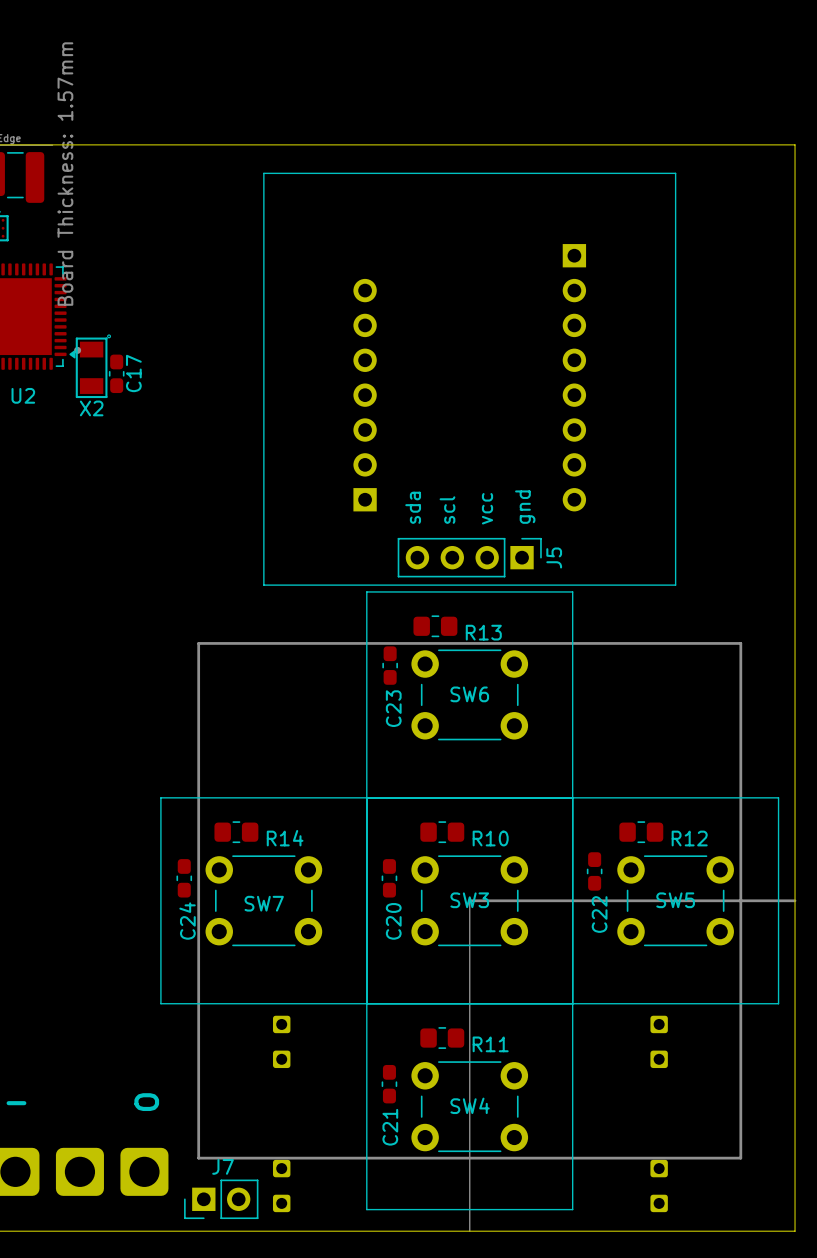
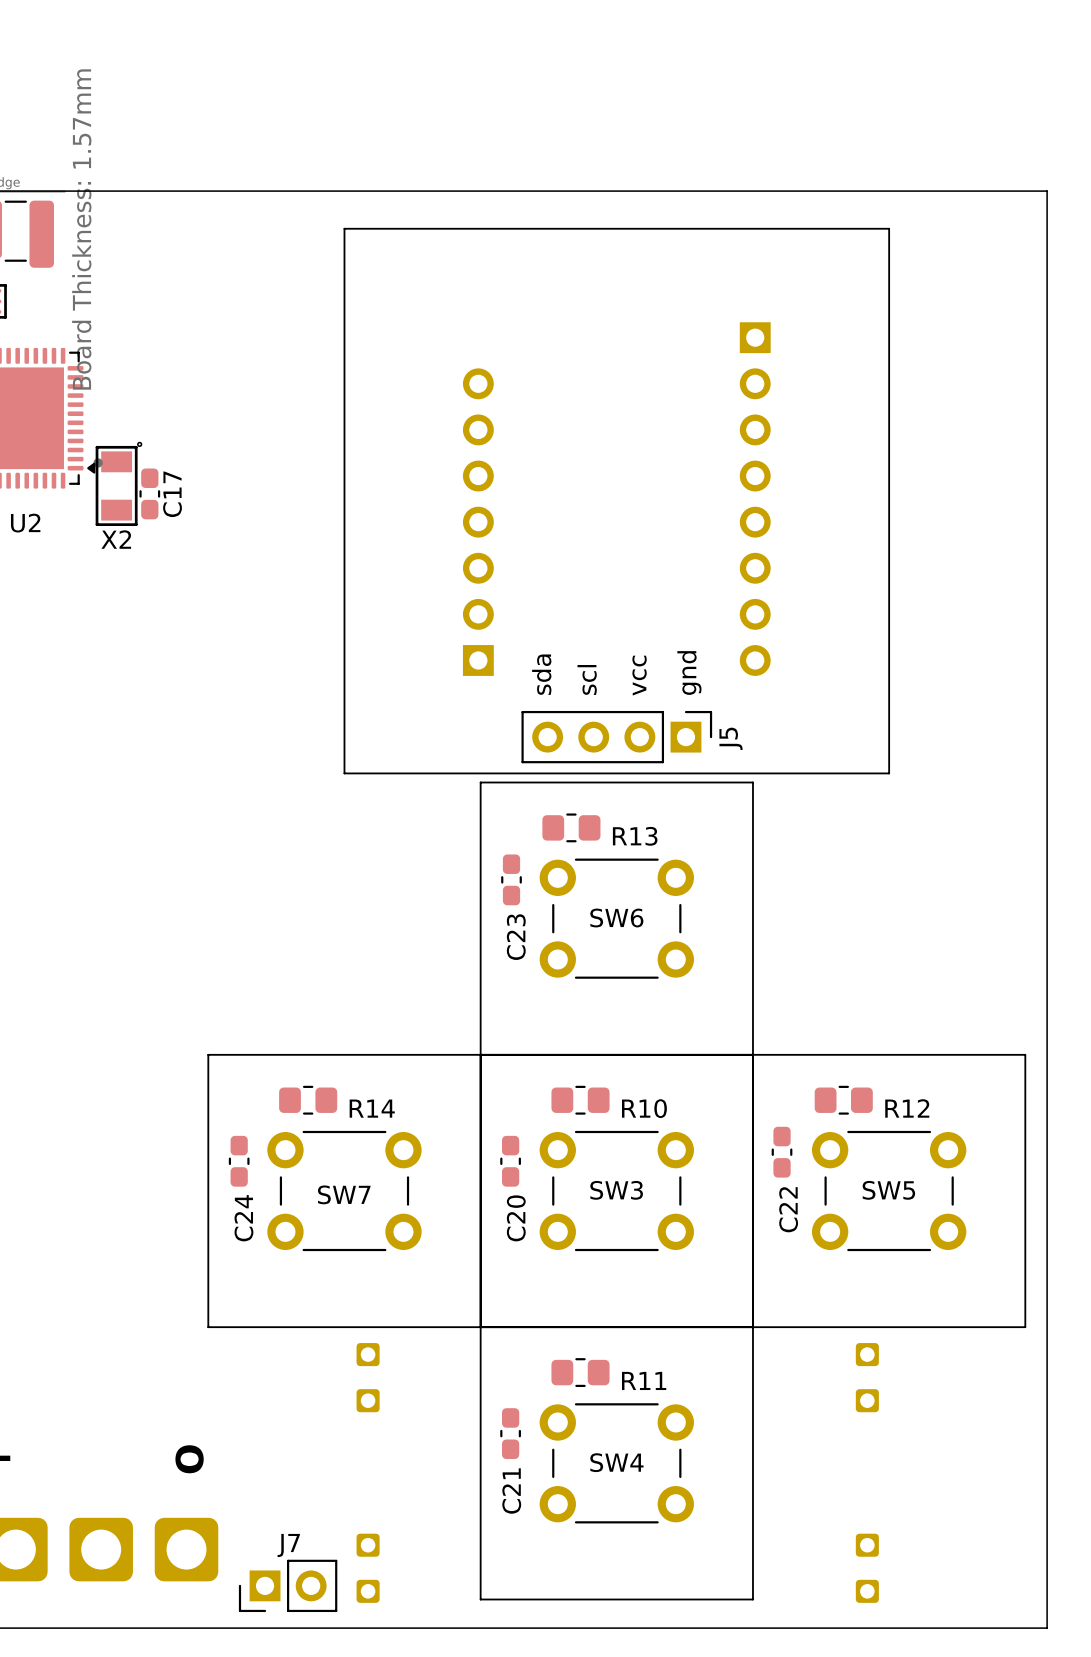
line: (198, 643) (740, 643) (740, 1158) (198, 1158) (198, 643) -> none
line: (795, 900) (469, 900) (469, 1231) -> none

